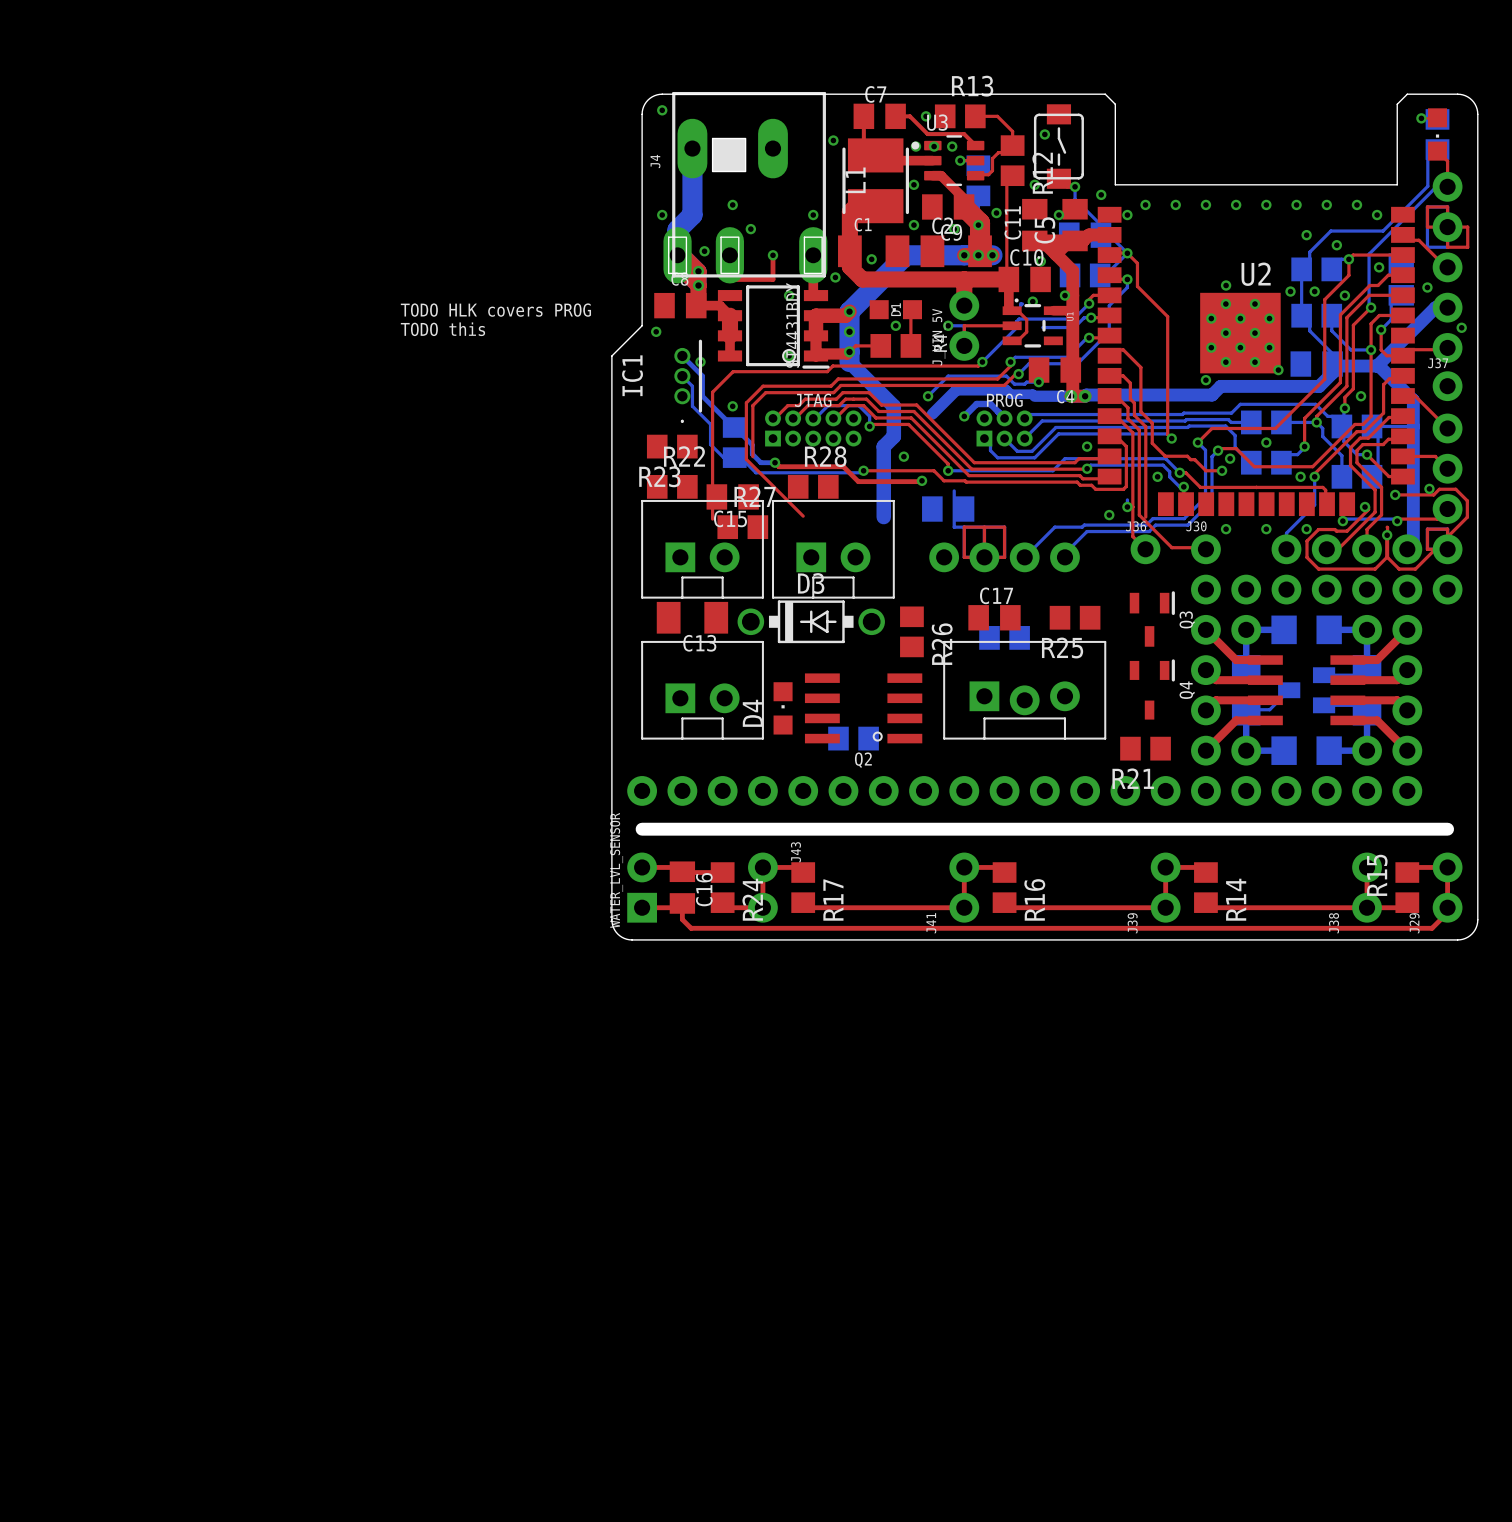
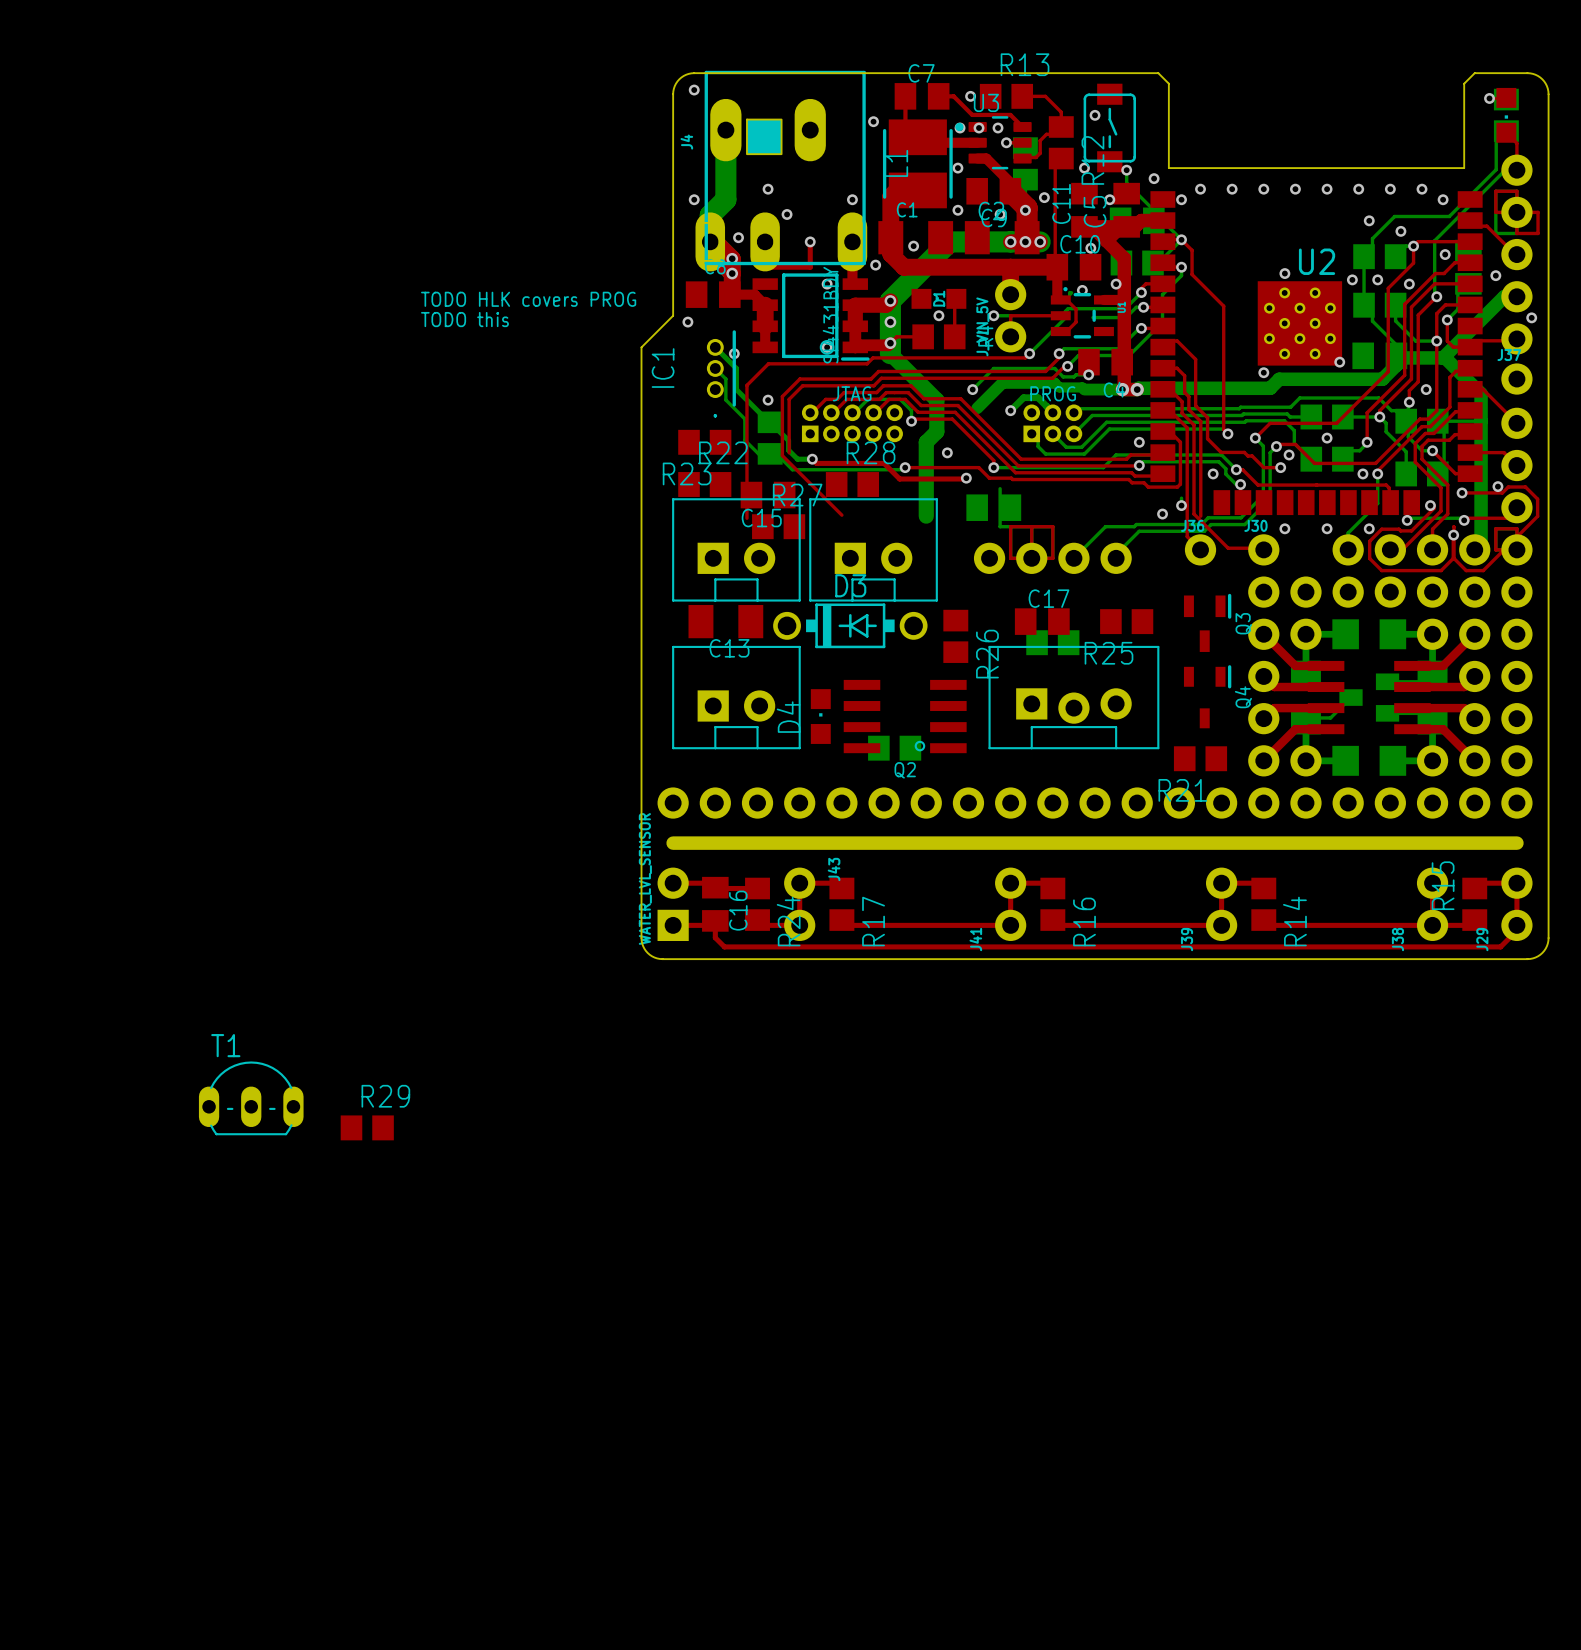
part: none -> (1516, 718)
T1: none -> (251, 1098)
R29: none -> (367, 1127)

